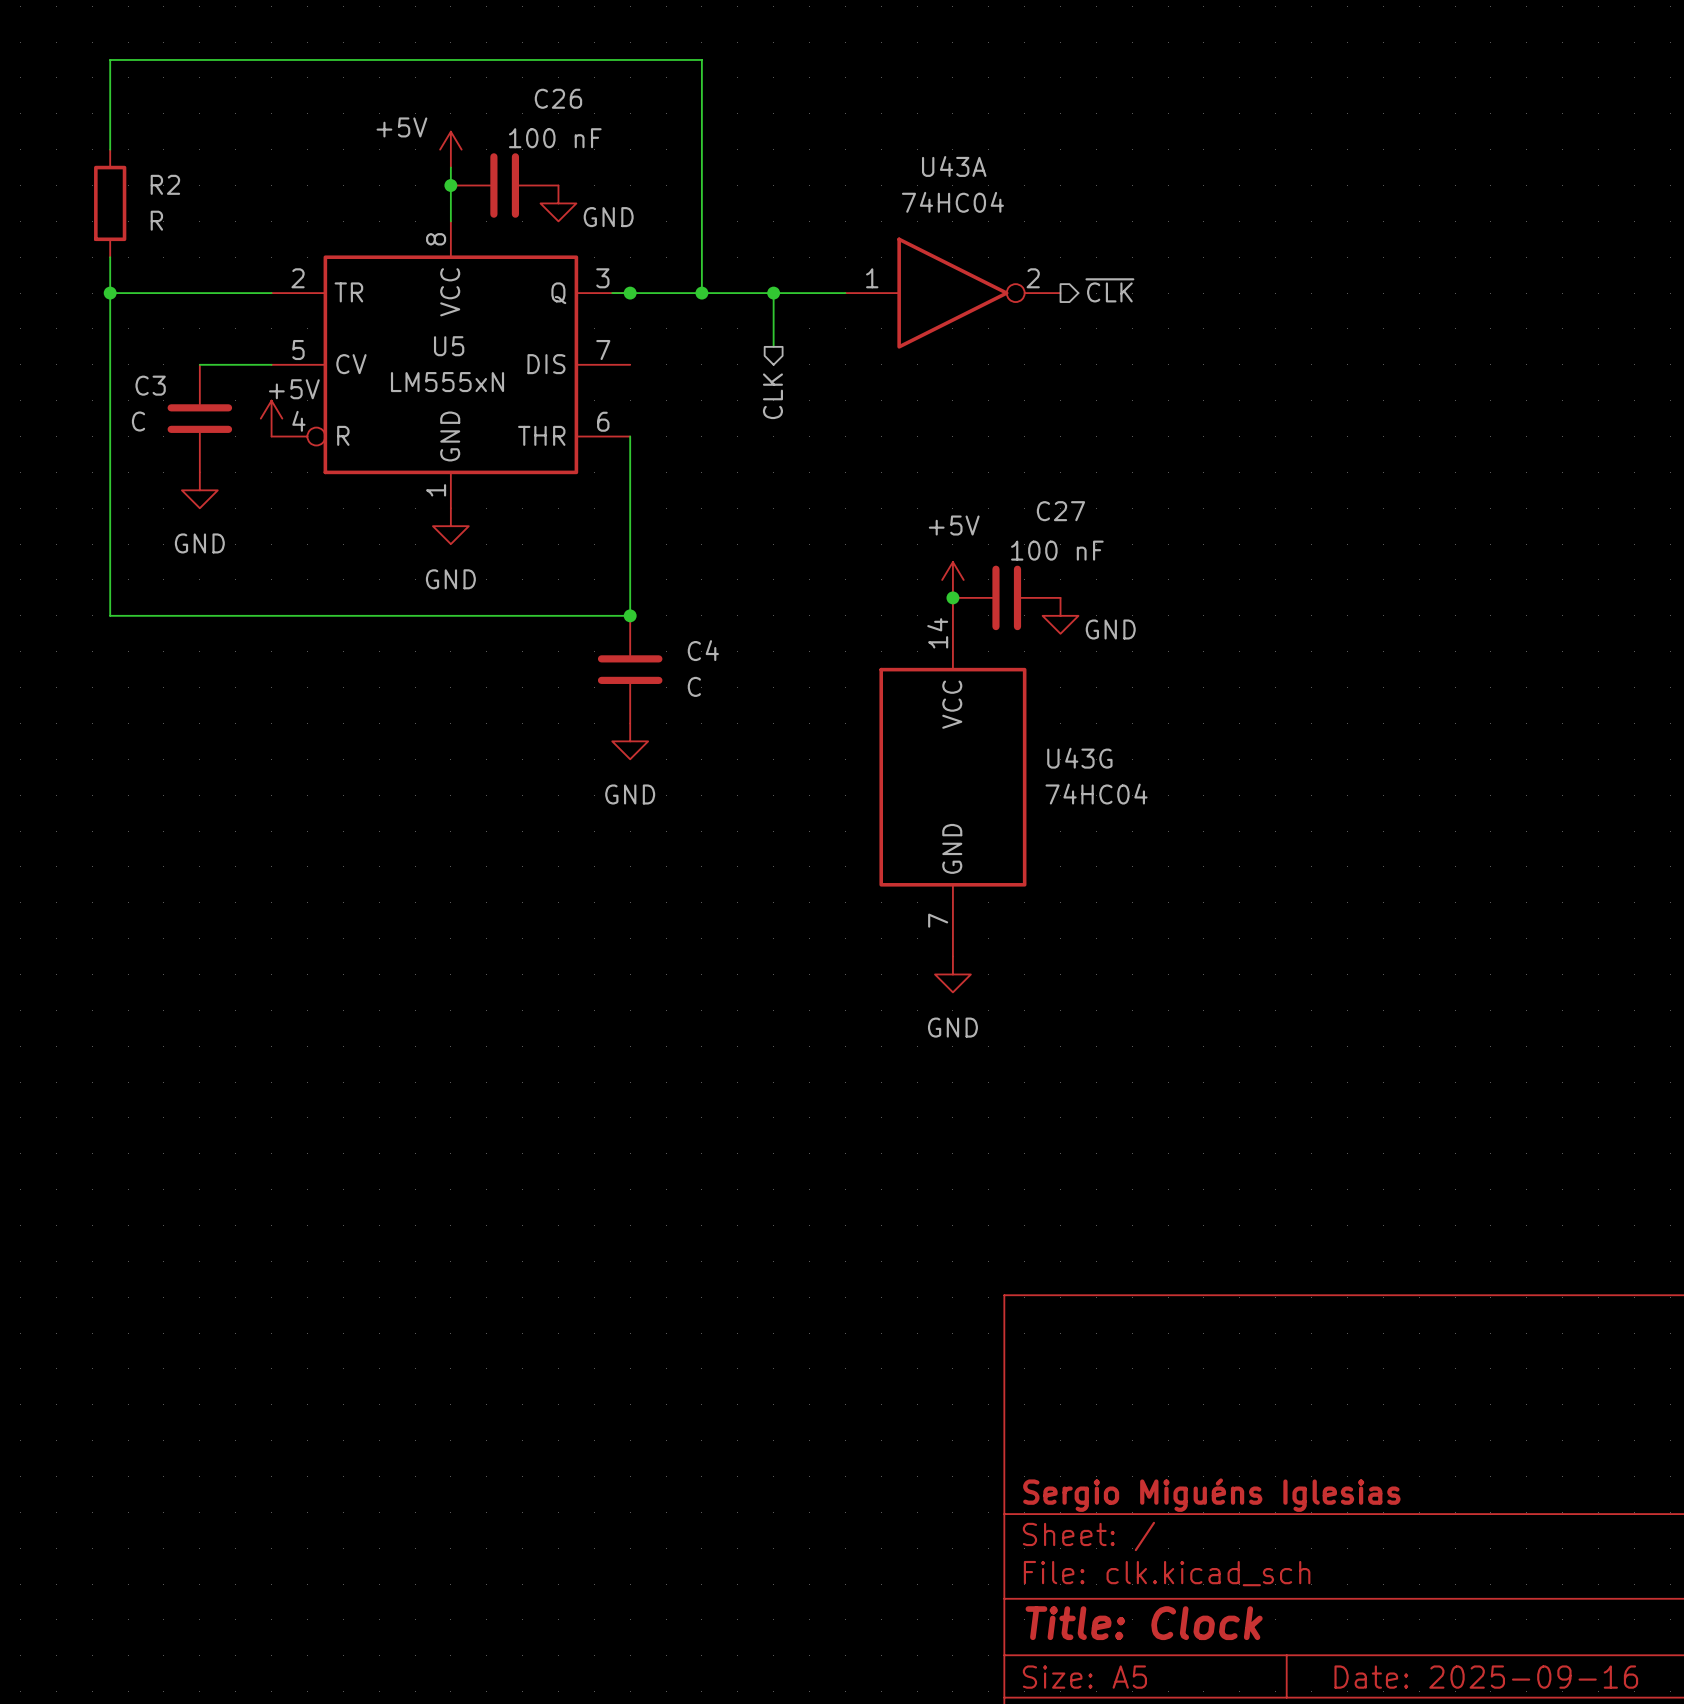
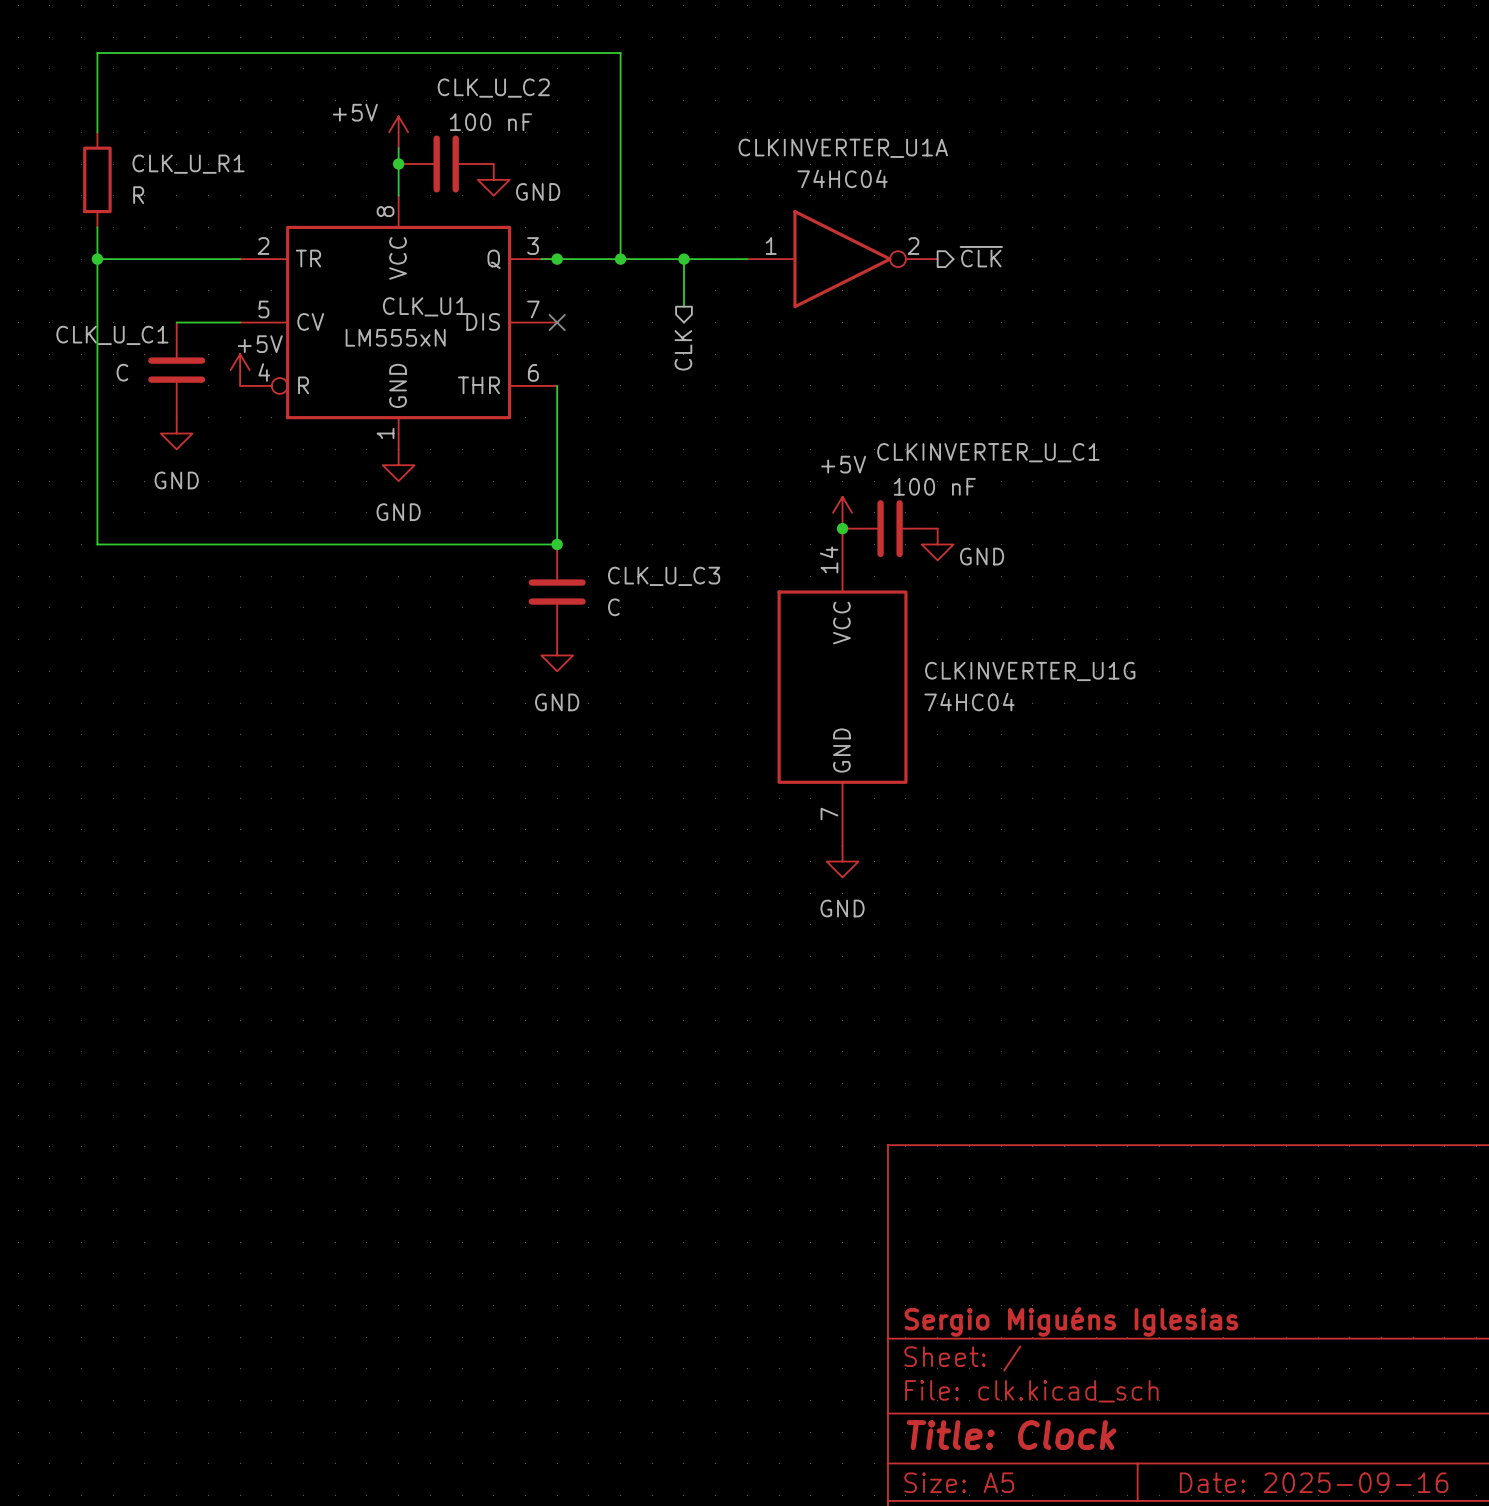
C26 name: C26 (558, 98) -> CLK_U_C2 (493, 88)
U43A name: U43A (954, 166) -> CLKINVERTER_U1A (843, 148)
R2 name: R2 (165, 184) -> CLK_U_R1 (188, 164)
U5 name: U5 (449, 346) -> CLK_U1 (425, 306)
no-connect mark: none -> (557, 322)
C3 name: C3 (150, 385) -> CLK_U_C1 (112, 335)
C27 name: C27 (1060, 511) -> CLKINVERTER_U_C1 (988, 452)
C4 name: C4 (703, 650) -> CLK_U_C3 (664, 576)
U43G name: U43G (1079, 758) -> CLKINVERTER_U1G (1030, 671)

